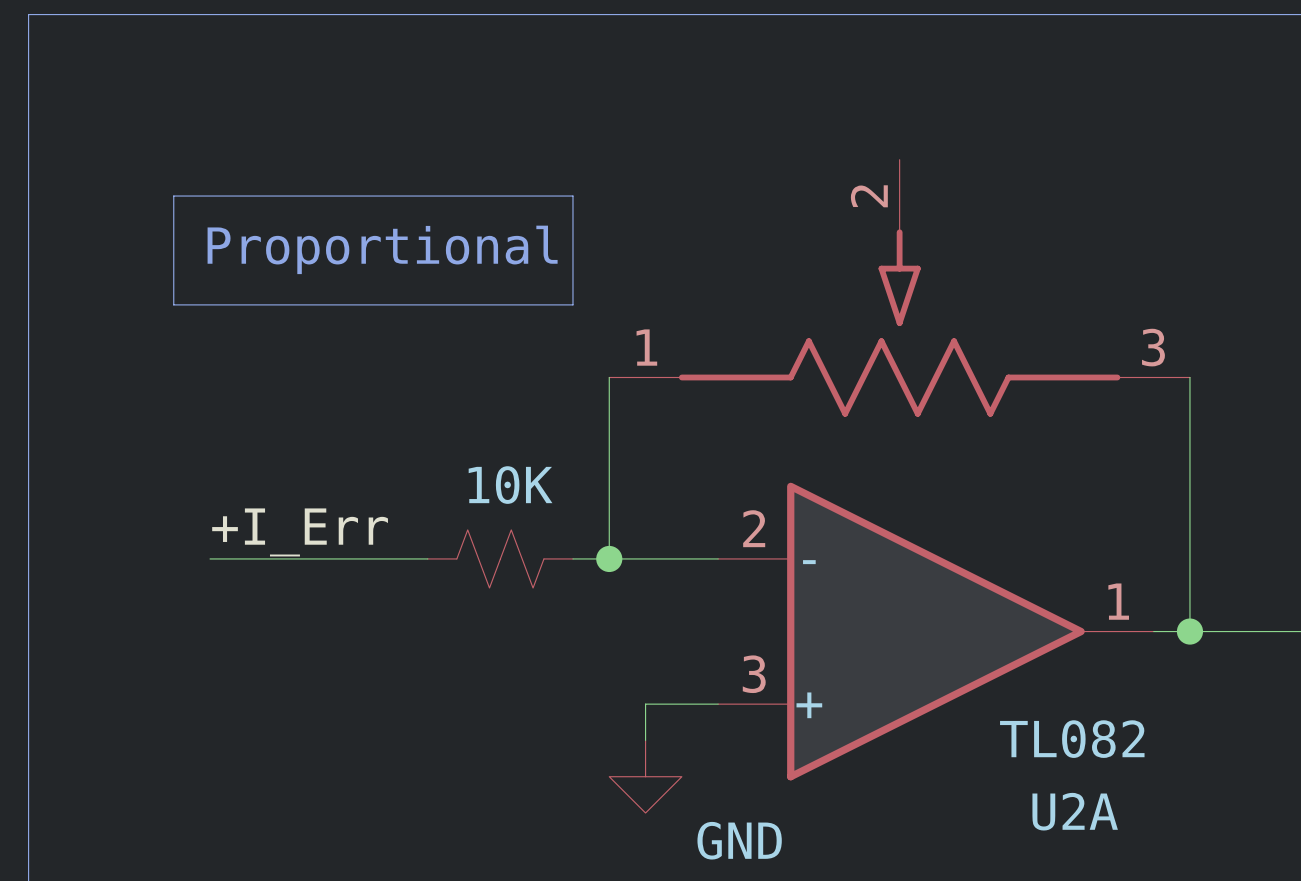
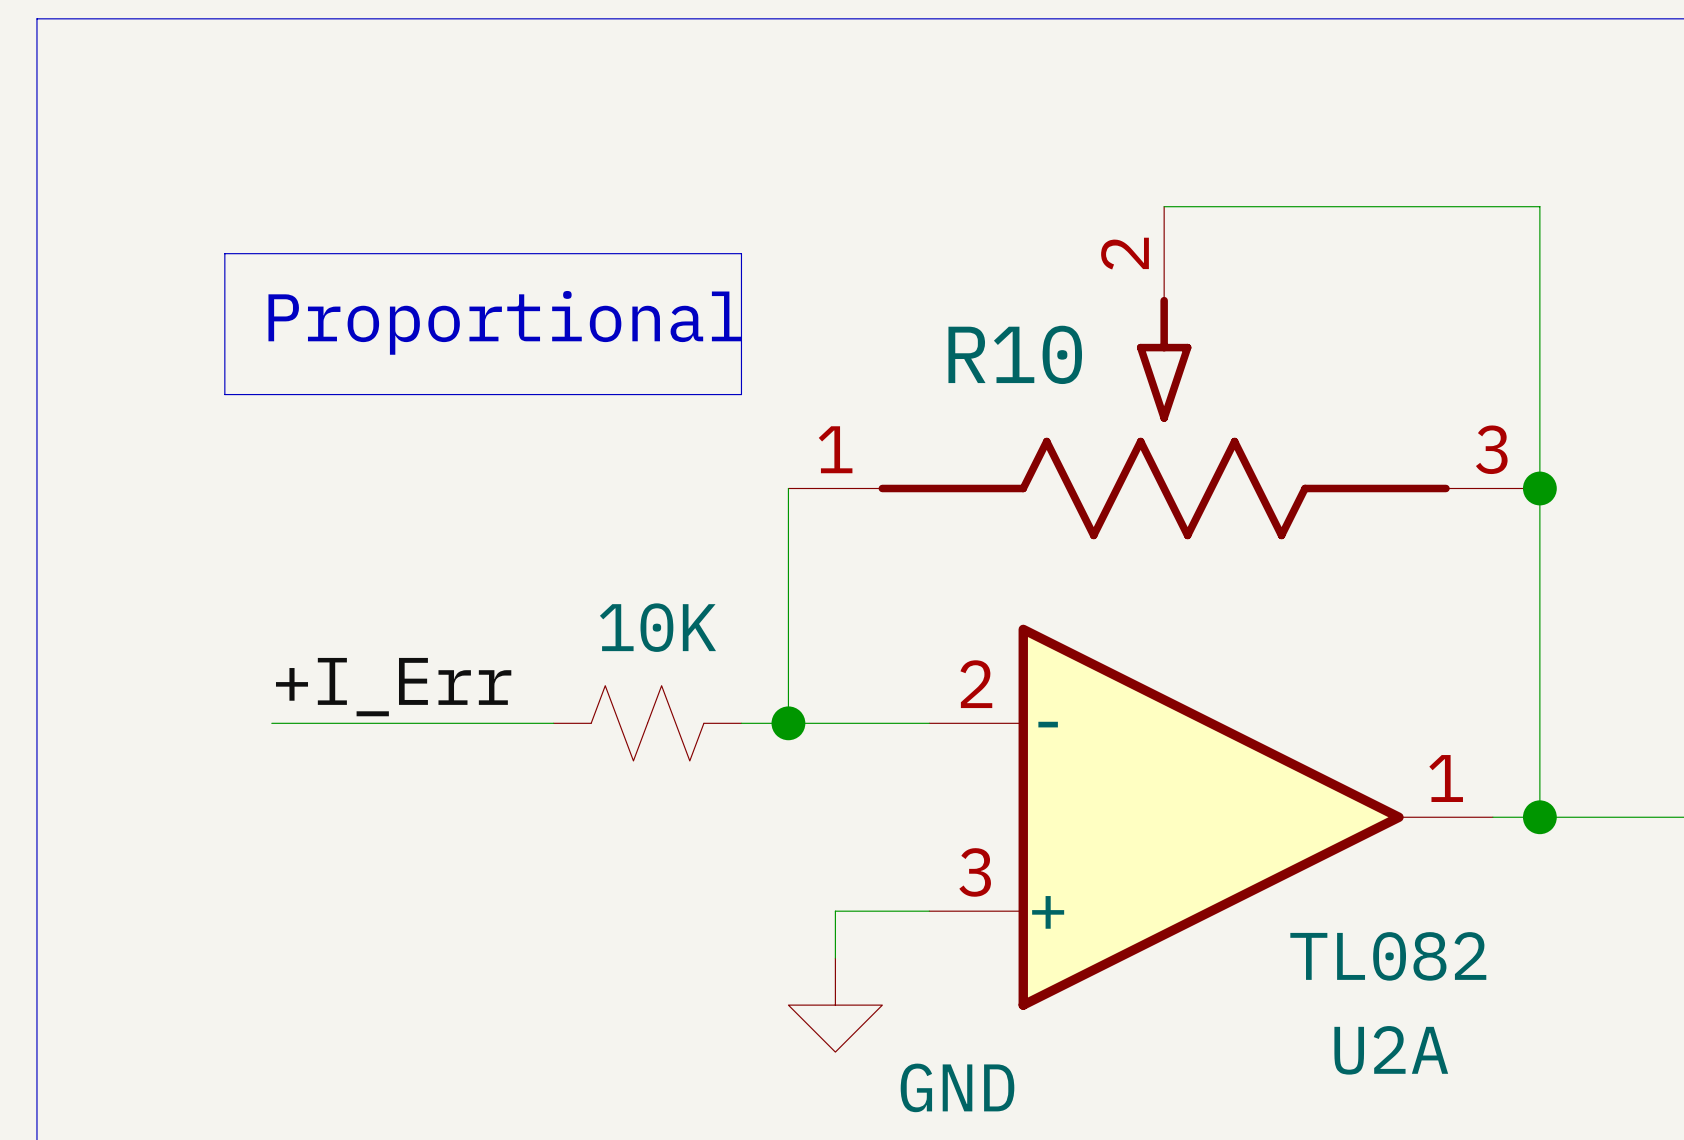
wire: none -> (1164, 206) (1539, 206) (1539, 488)
R10 name: none -> R10 (1015, 354)
junction: none -> (1539, 488)

